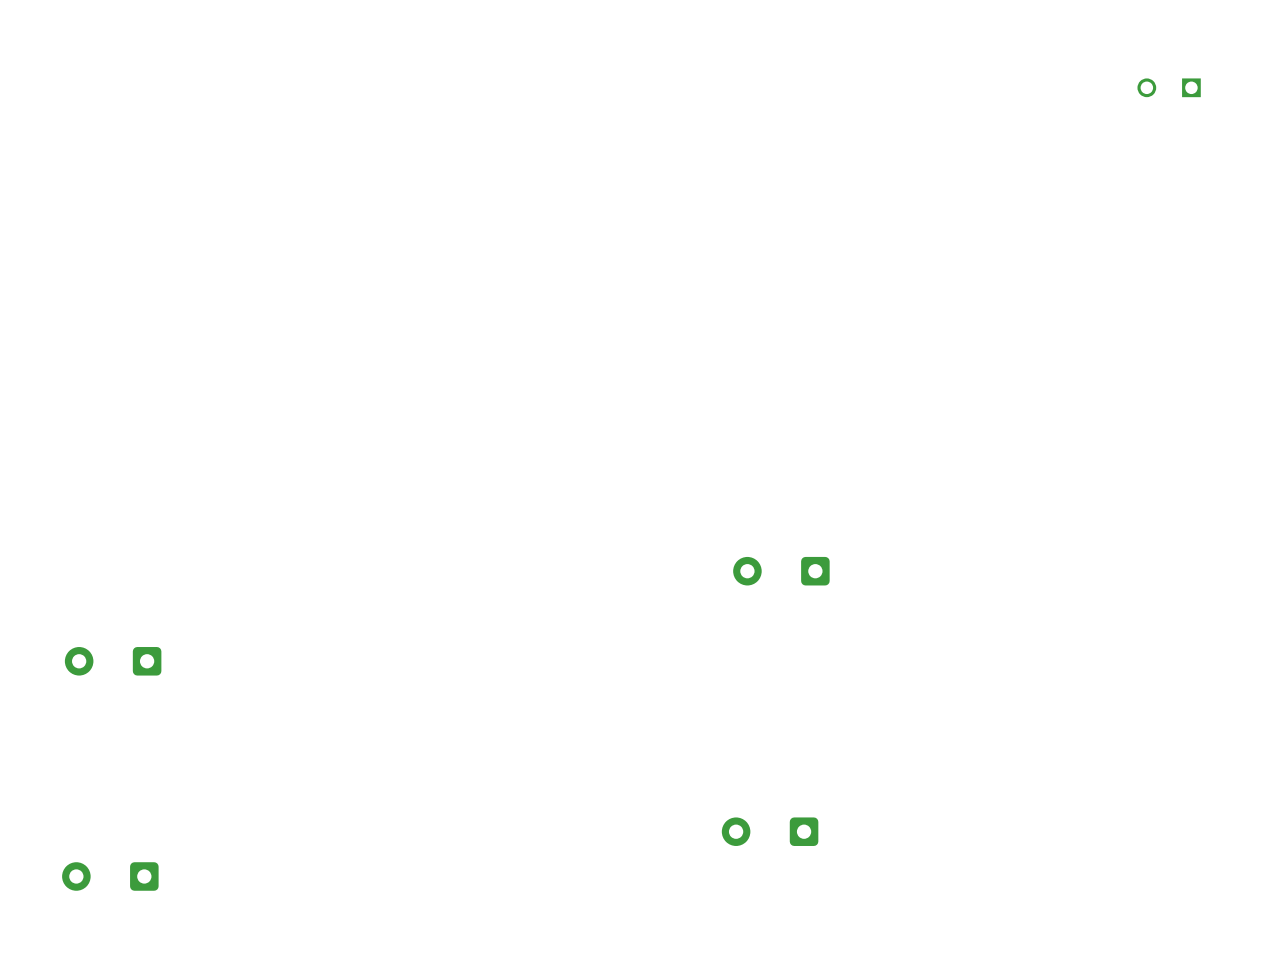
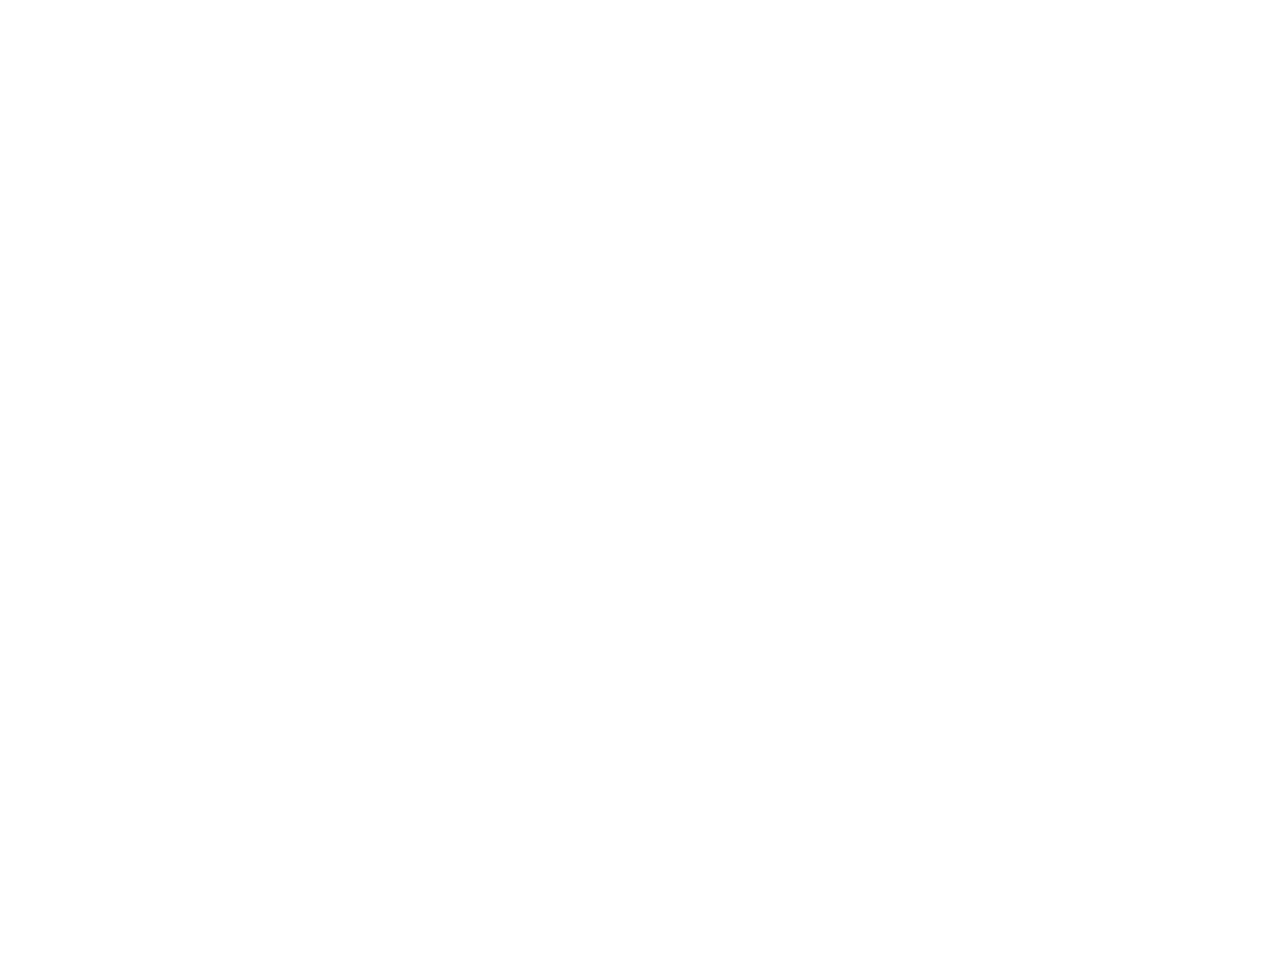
part: (1169, 87) -> none
part: (781, 571) -> none
part: (113, 661) -> none
part: (770, 831) -> none
part: (110, 876) -> none

